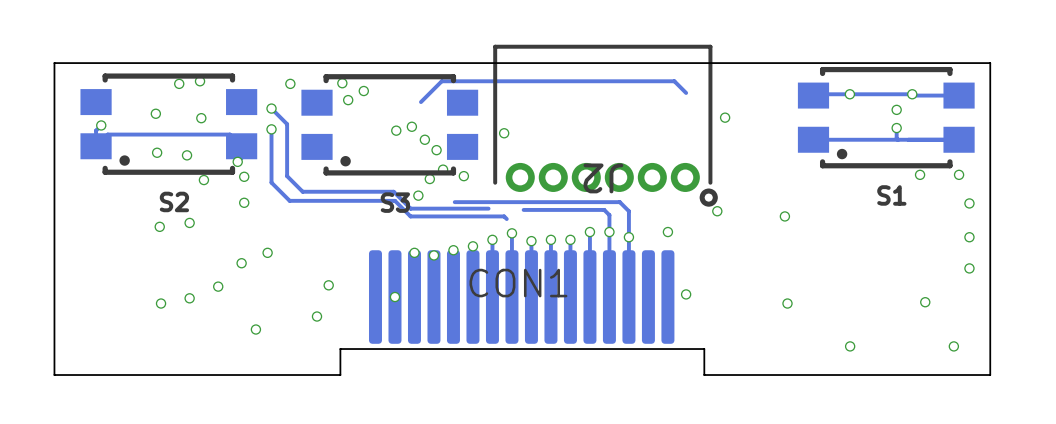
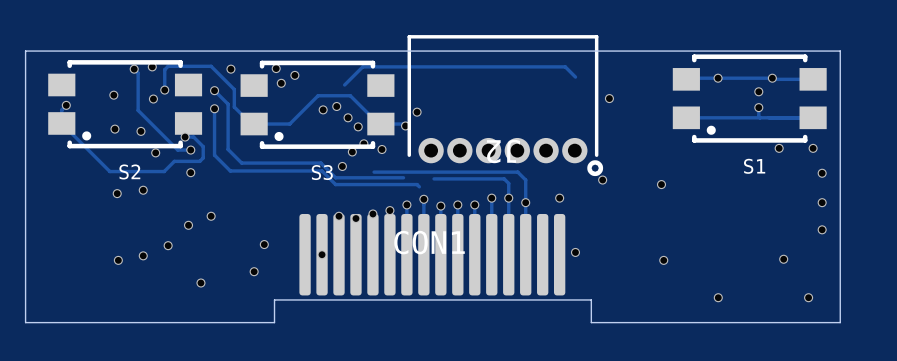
track: none -> (134, 69) (138, 73) (138, 110) (177, 150) (190, 150)
track: none -> (164, 90) (164, 69) (168, 66) (211, 66) (234, 89) (234, 107) (251, 124) (289, 124) (318, 95) (350, 95) (378, 124) (403, 124) (405, 125)
via: none -> (164, 90)
track: (241, 146) (229, 134) (107, 134) (96, 146) -> (185, 137) (193, 137) (203, 146) (203, 157) (199, 161) (174, 161) (164, 171) (109, 171) (61, 123)
via: none -> (405, 125)

